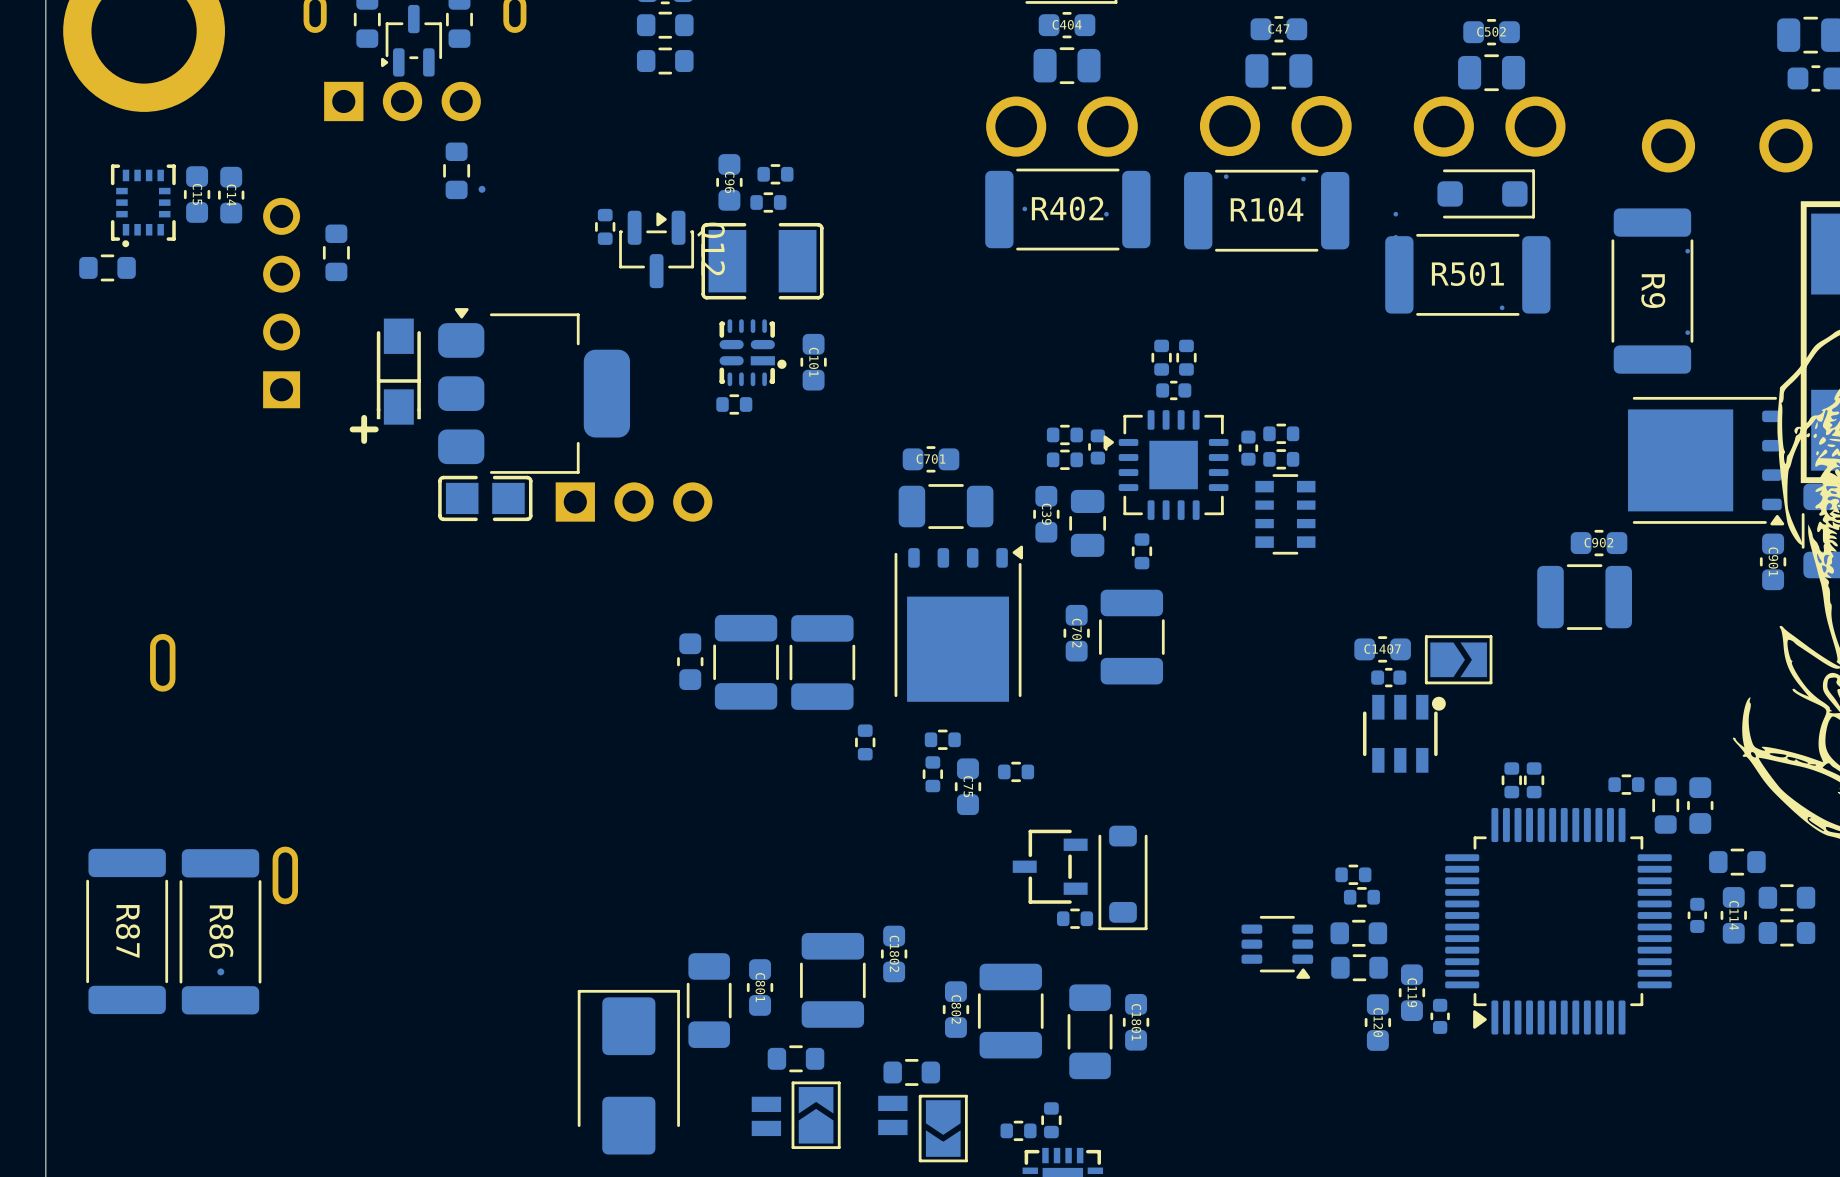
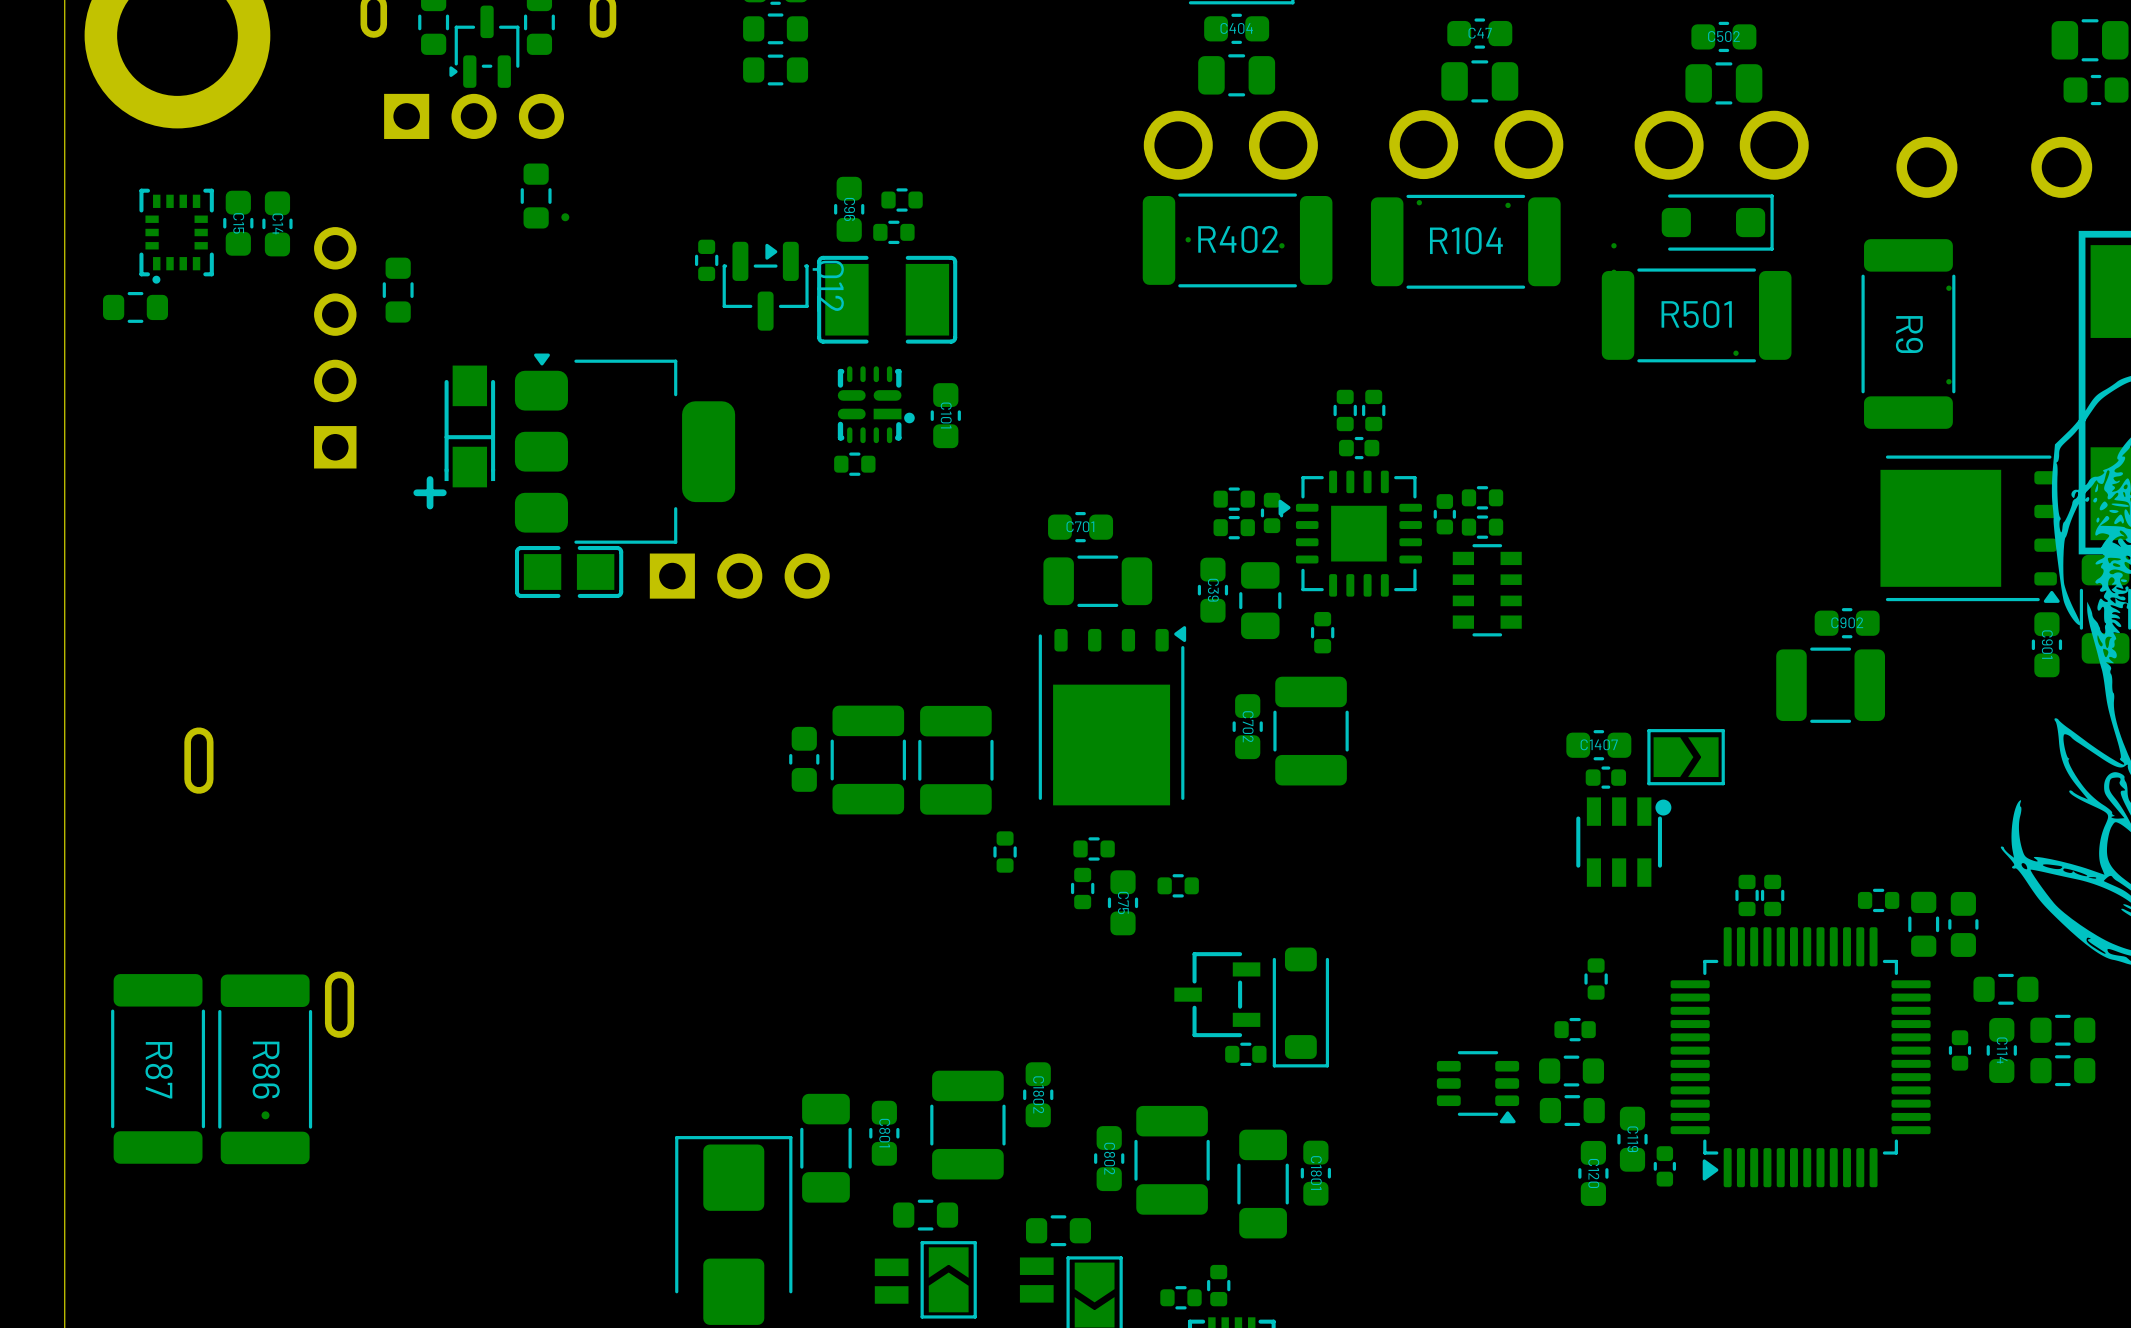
part rotation: 0° (1353, 874) -> 90° clockwise (1596, 979)
part position: (1353, 874) -> (1596, 979)

